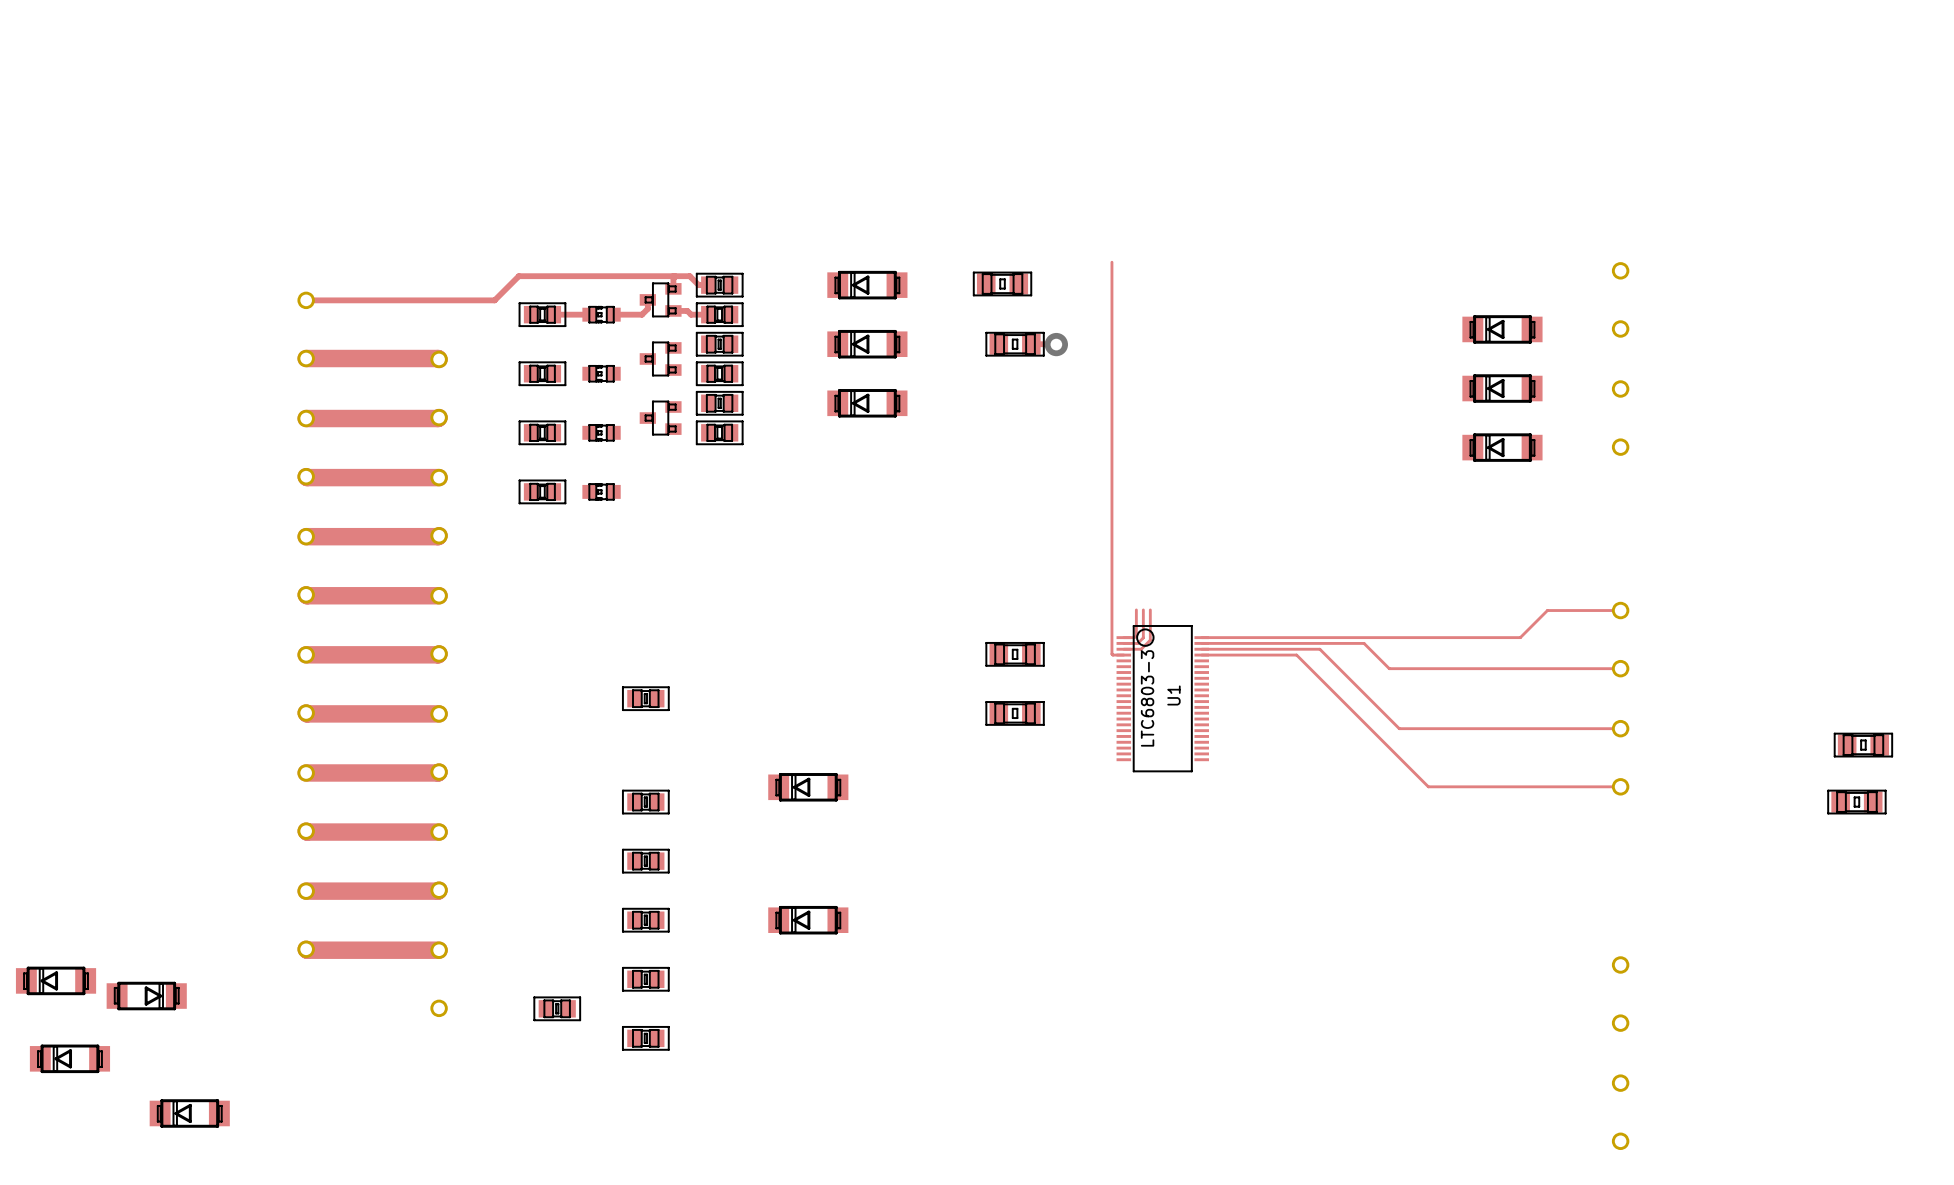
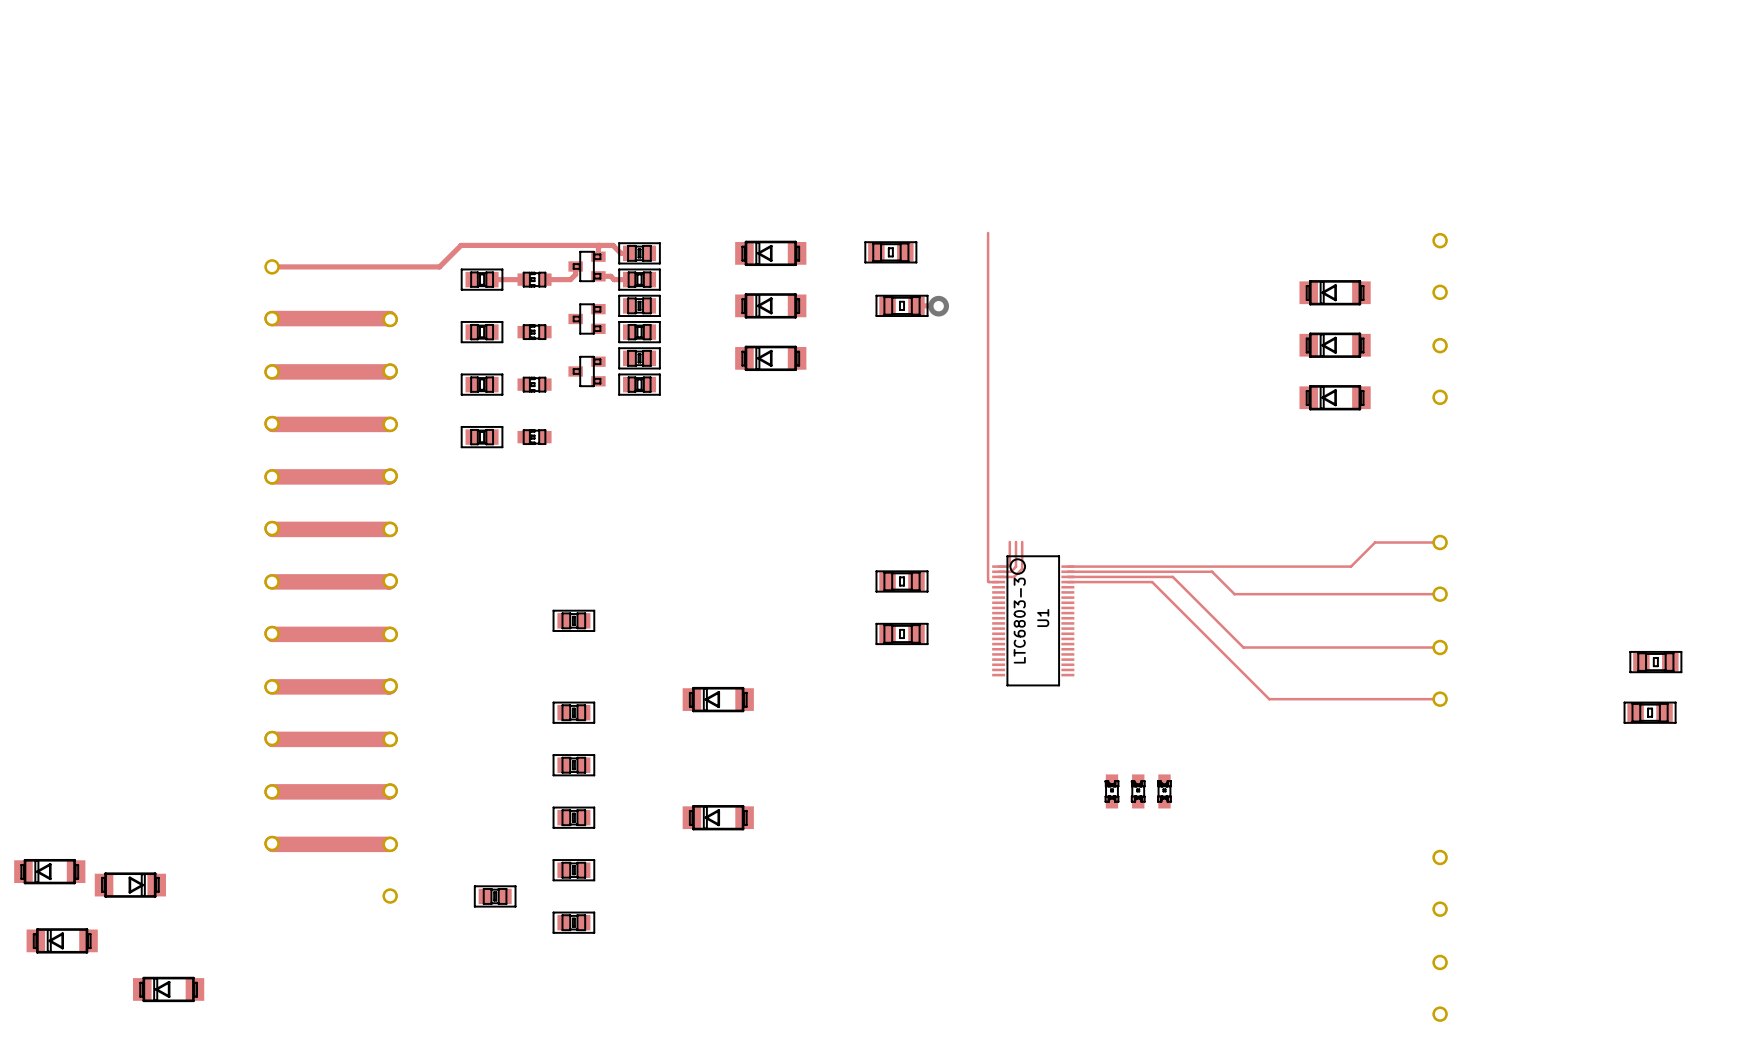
part: none -> (1111, 791)
part: none -> (1138, 791)
part: none -> (1164, 791)

